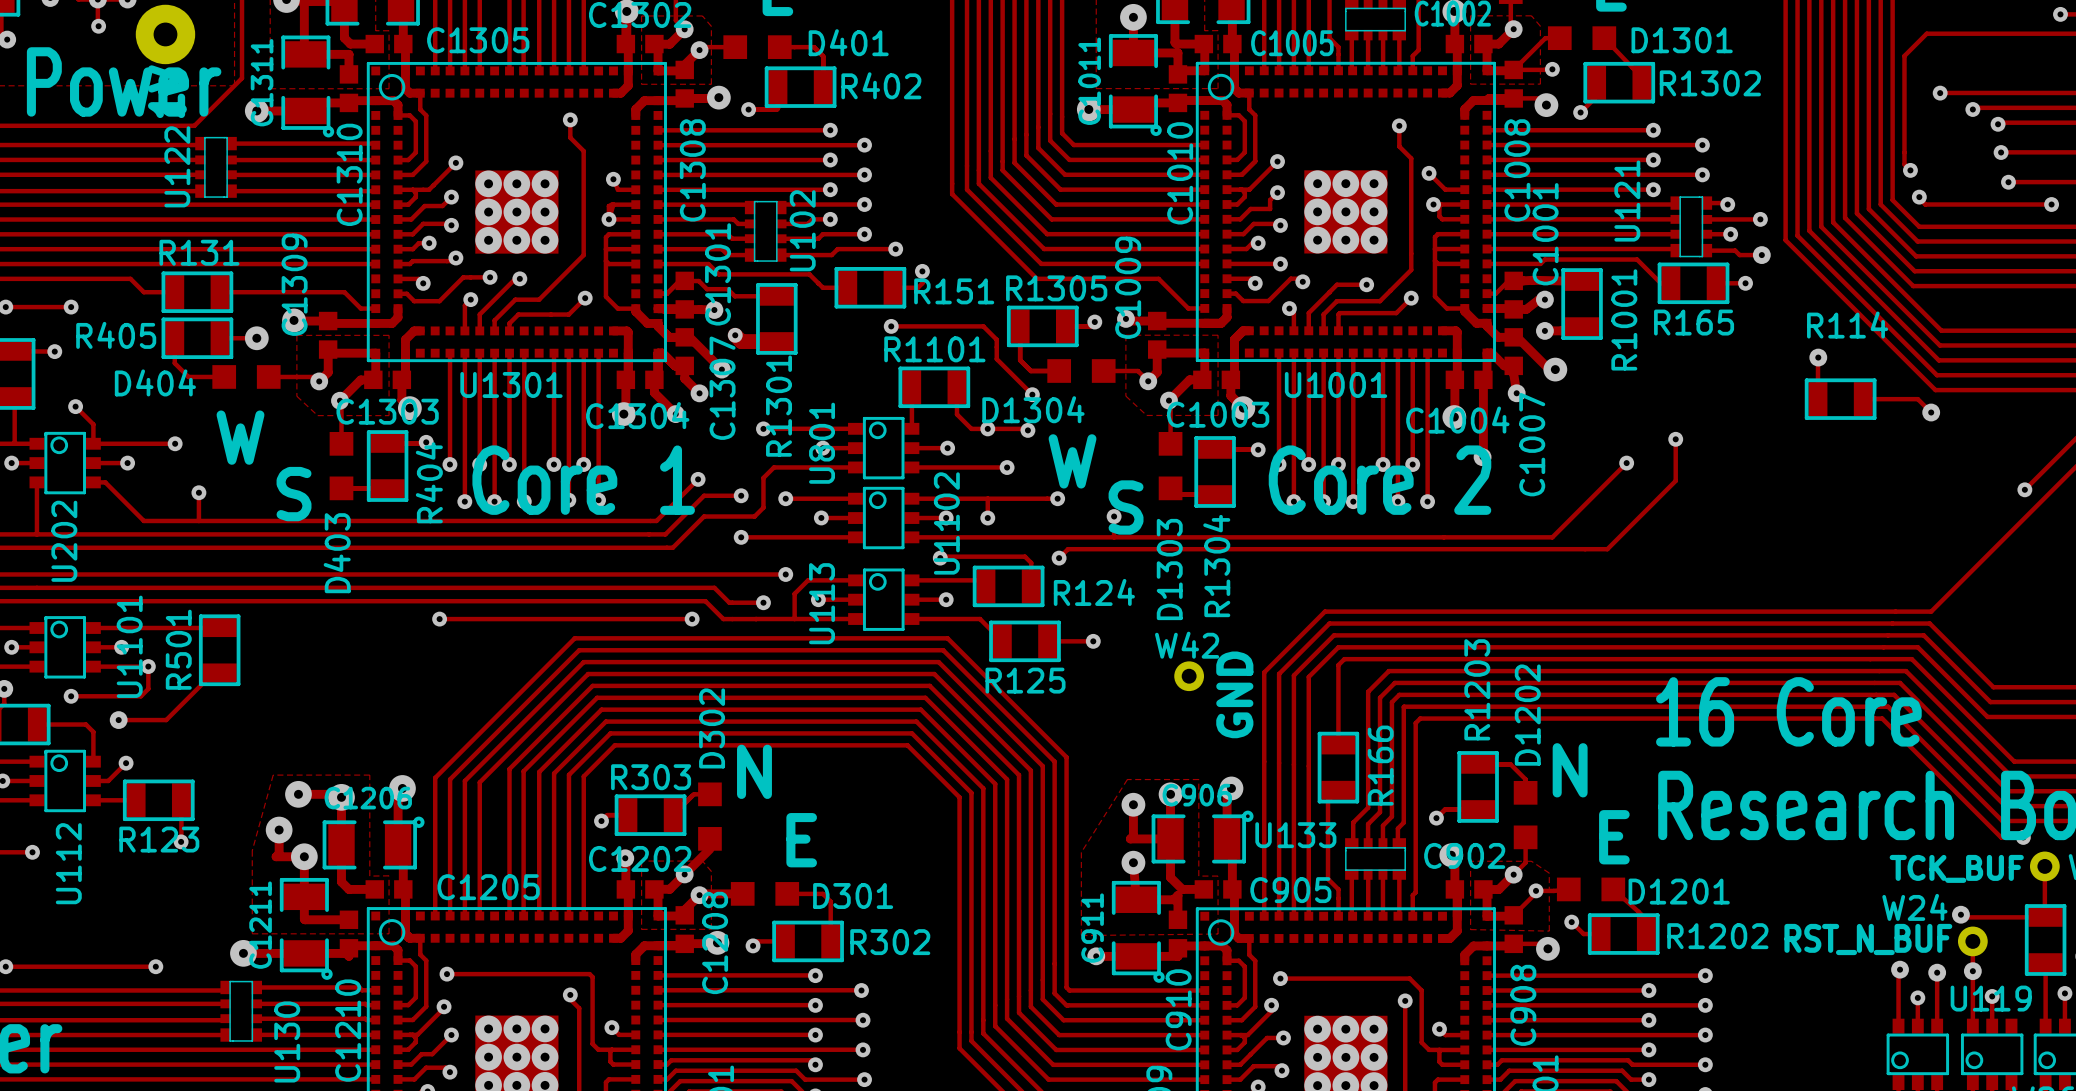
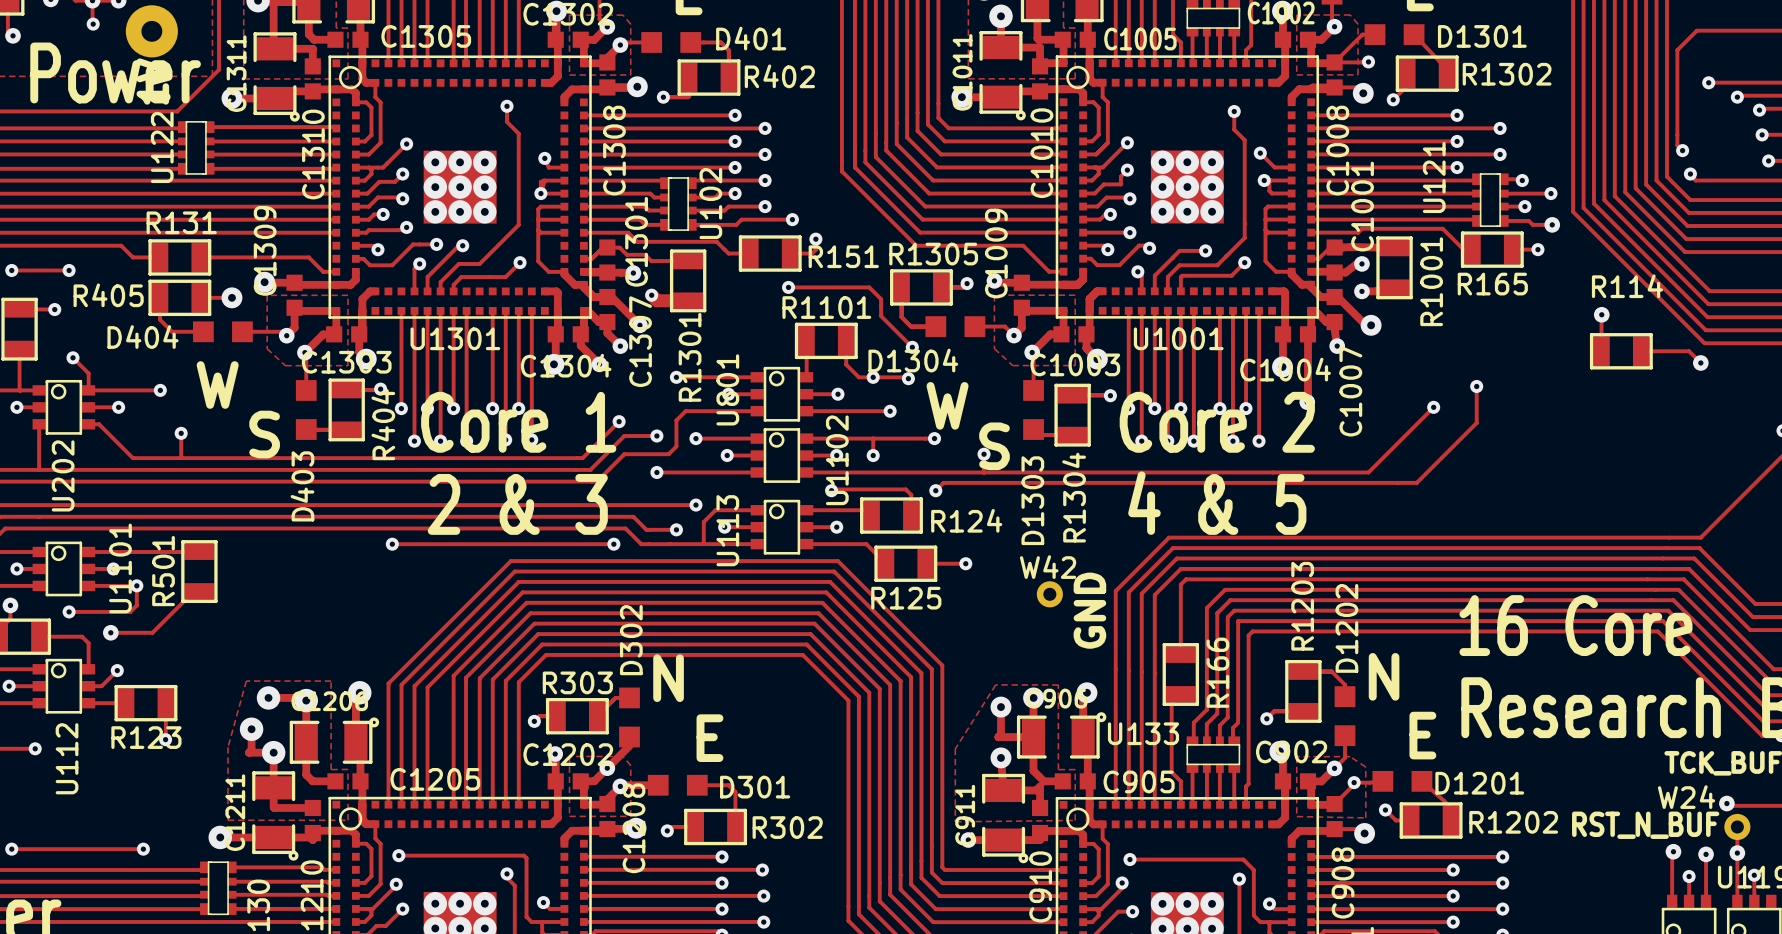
text: none -> 4 & 5 (1217, 503)
text: none -> 2 & 3 (517, 504)

